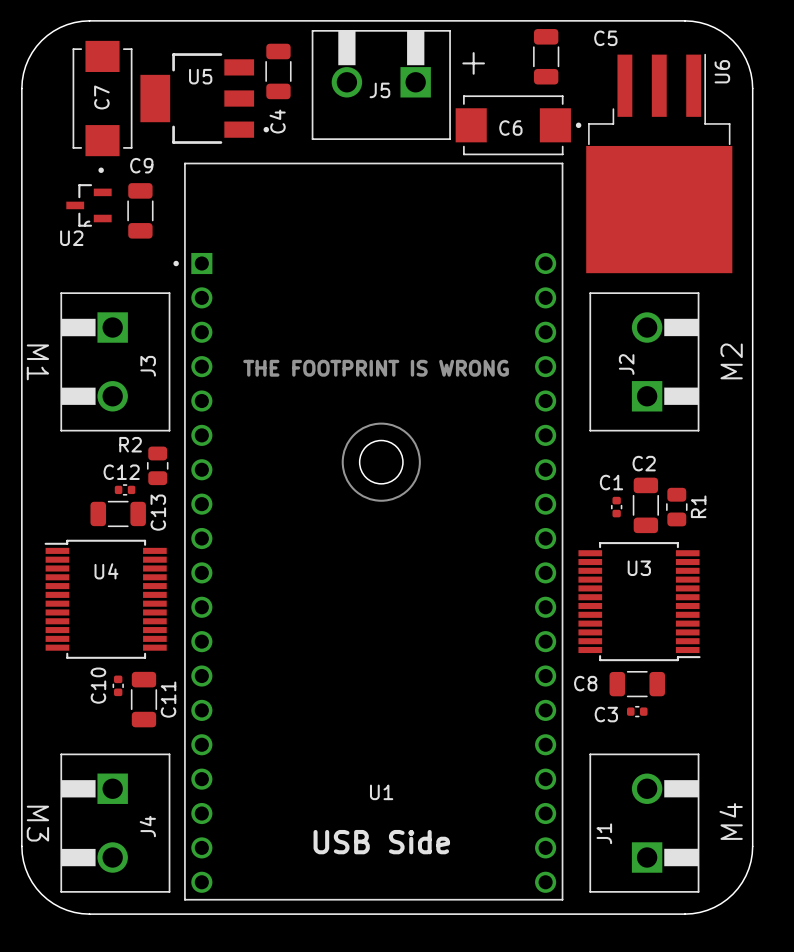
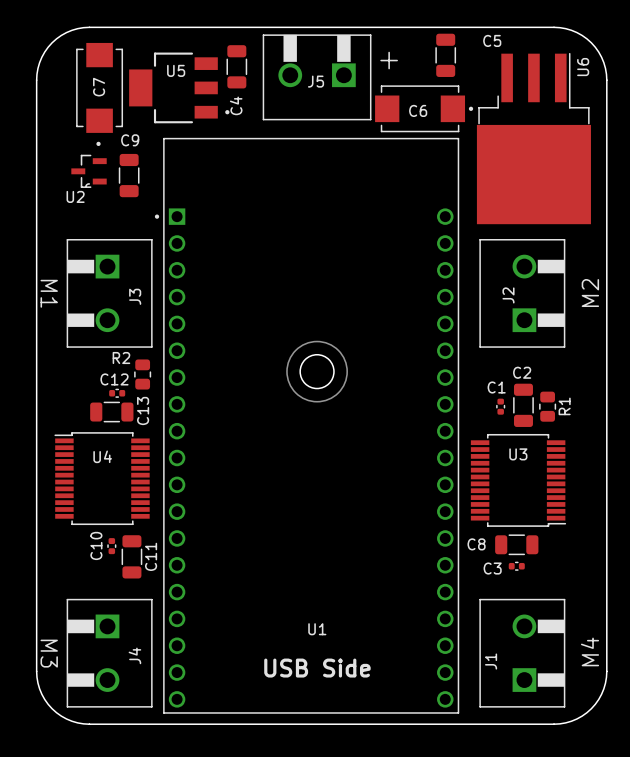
text: THE FOOTPRINT IS WRONG (376, 368) -> none

